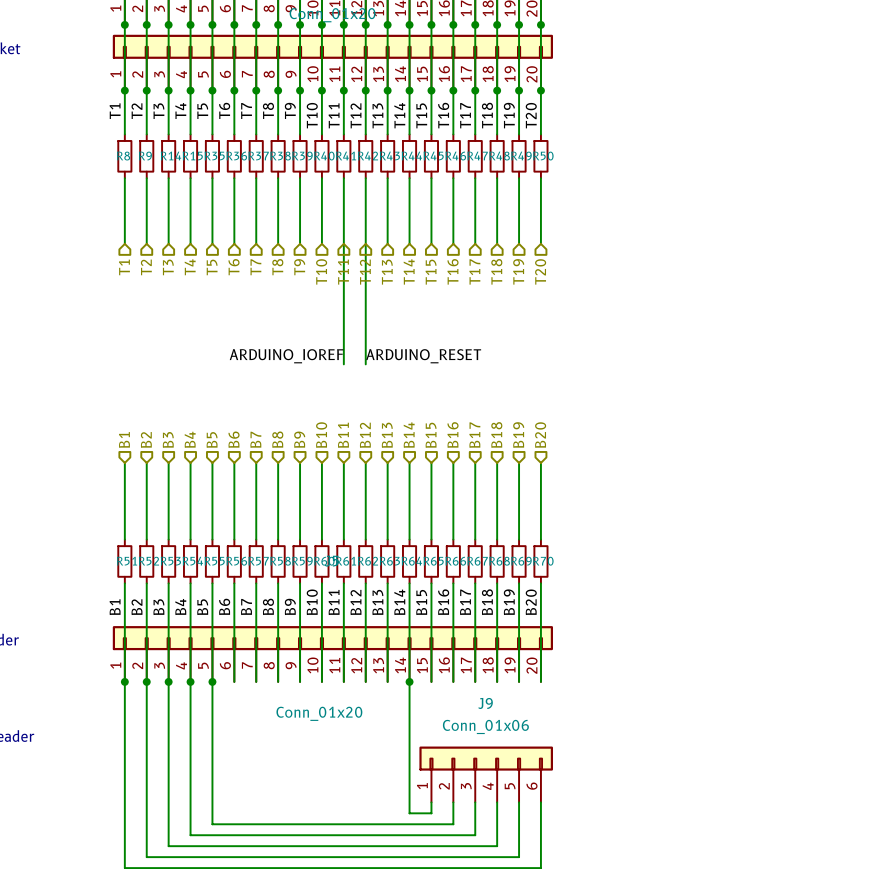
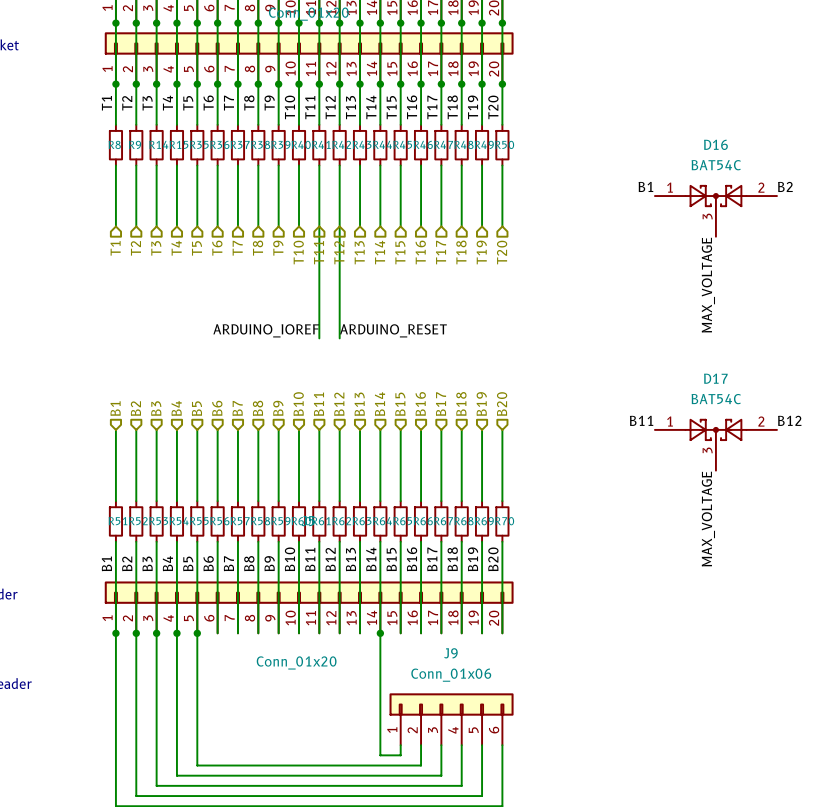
label: none -> B1 (645, 186)
label: none -> B2 (785, 186)
D16: none -> BAT54C (715, 211)
label: none -> MAX_VOLTAGE (708, 285)
label: none -> B11 (641, 420)
label: none -> B12 (789, 420)
D17: none -> BAT54C (715, 445)
label: none -> MAX_VOLTAGE (708, 519)

